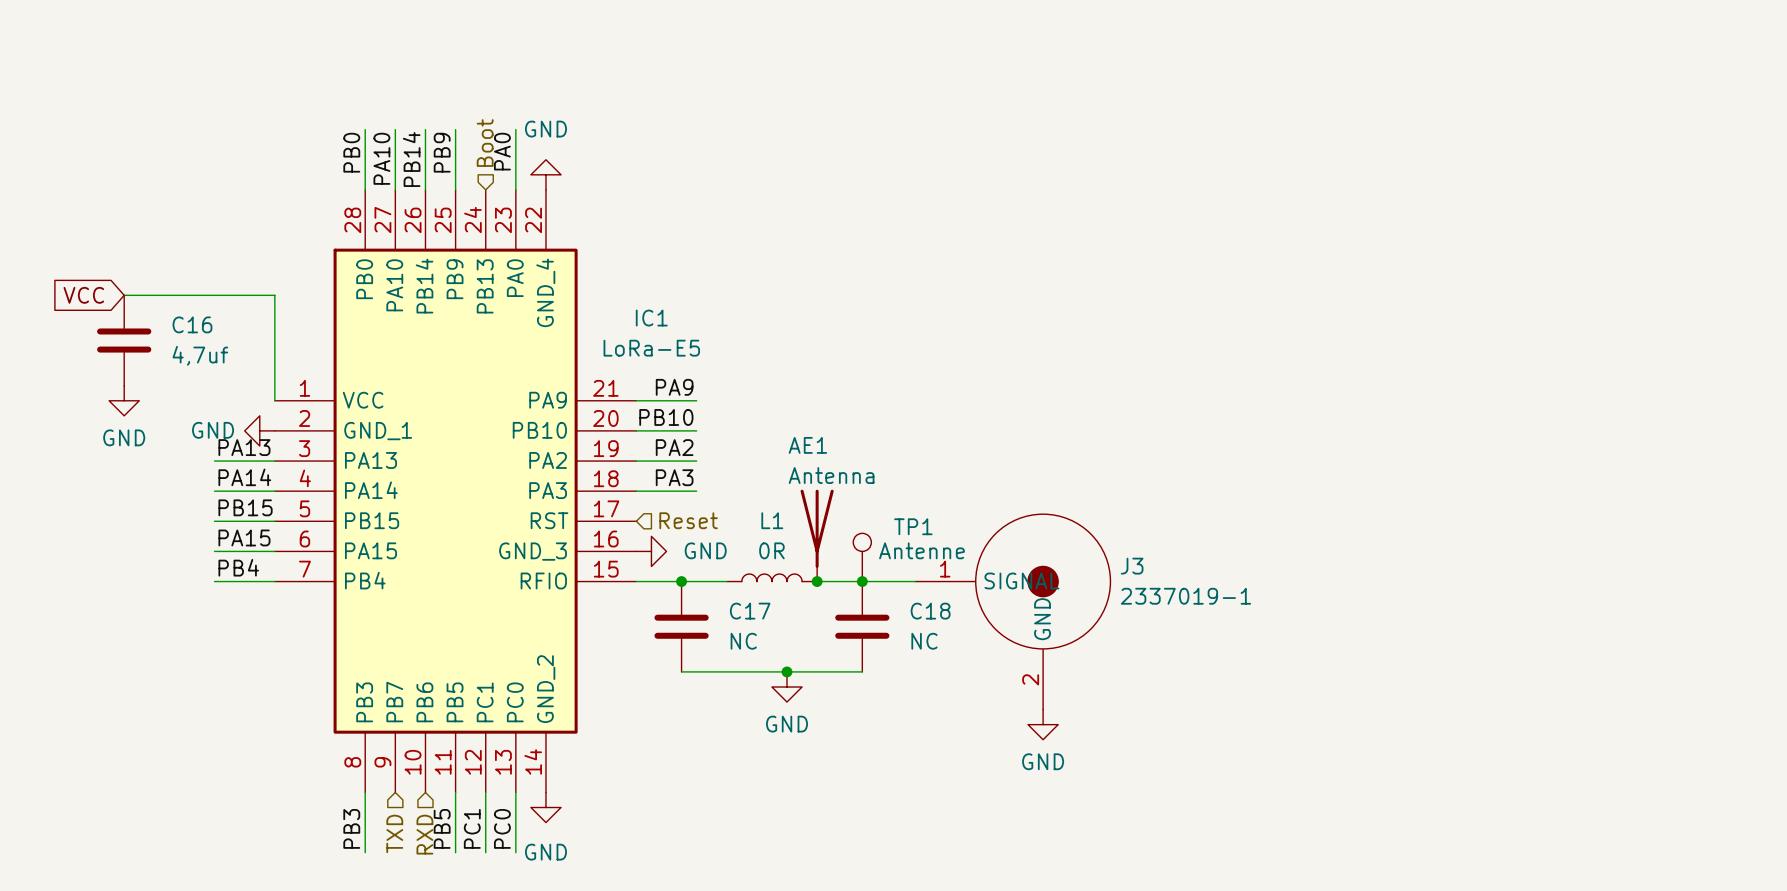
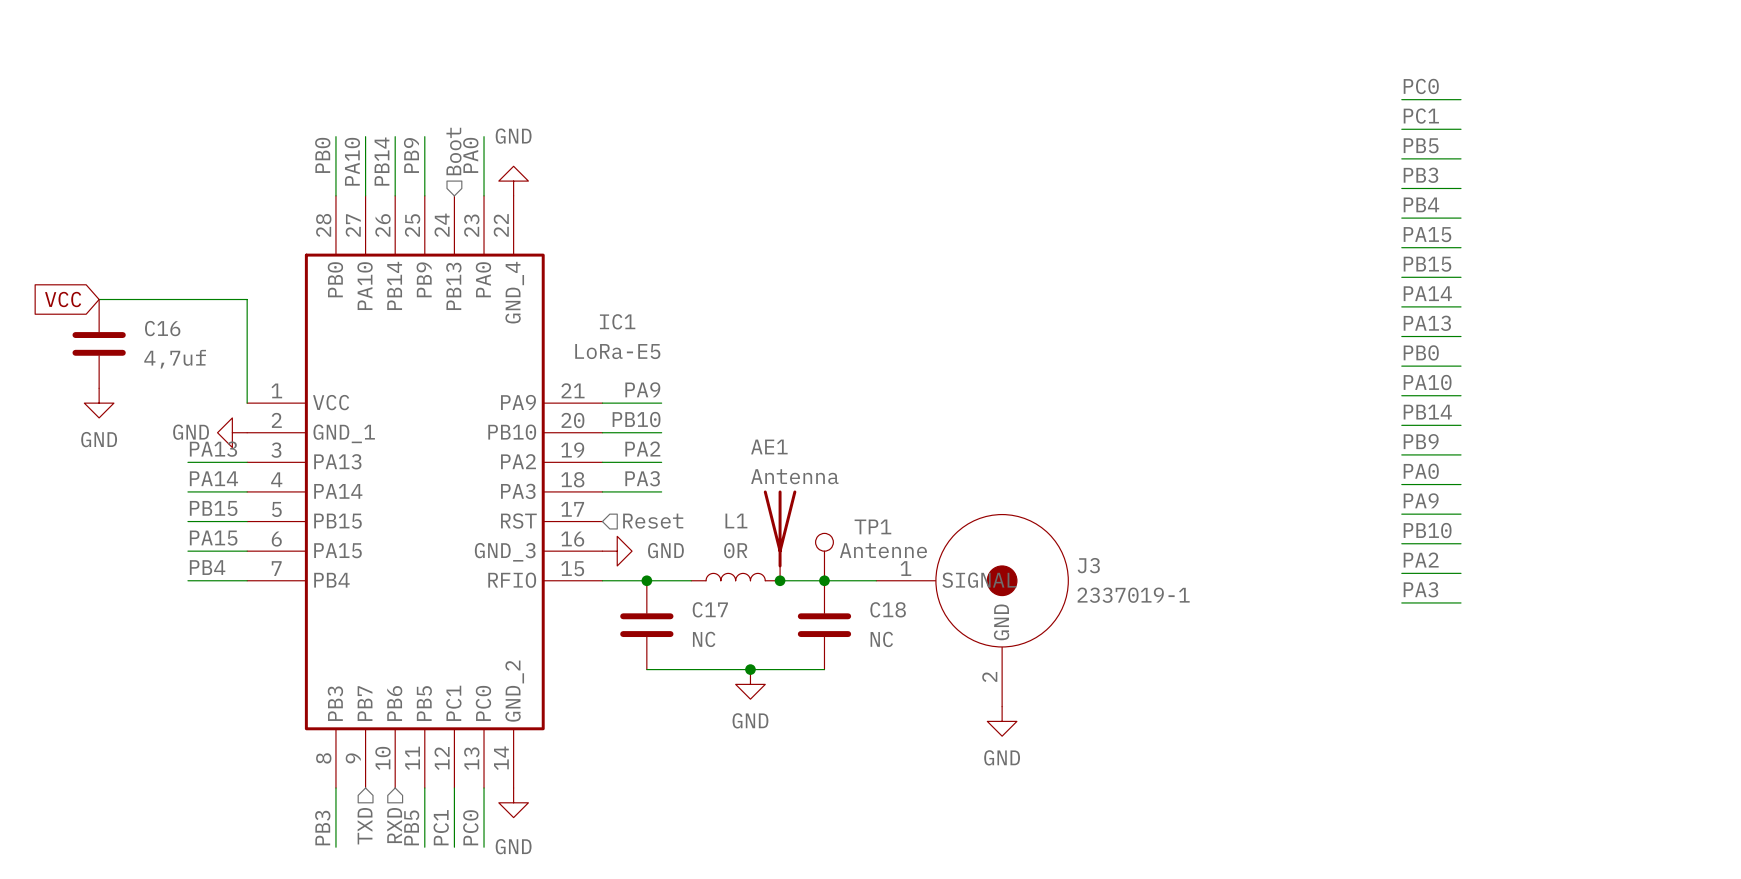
label: none -> PC0 (1421, 86)
wire: none -> (1401, 99) (1461, 99)
label: none -> PC1 (1421, 116)
wire: none -> (1401, 129) (1461, 129)
label: none -> PB5 (1421, 145)
wire: none -> (1401, 158) (1461, 158)
label: none -> PB3 (1420, 175)
wire: none -> (1401, 188) (1461, 188)
label: none -> PB4 (1421, 204)
wire: none -> (1401, 218) (1461, 218)
label: none -> PA15 (1427, 234)
wire: none -> (1401, 247) (1461, 247)
label: none -> PB15 (1427, 264)
wire: none -> (1401, 277) (1461, 277)
label: none -> PA14 (1427, 293)
wire: none -> (1401, 306) (1461, 306)
label: none -> PA13 (1427, 323)
wire: none -> (1401, 336) (1461, 336)
label: none -> PB0 (1421, 352)
wire: none -> (1401, 366) (1461, 366)
label: none -> PA10 (1427, 382)
wire: none -> (1401, 395) (1461, 395)
label: none -> PB14 (1427, 412)
wire: none -> (1401, 425) (1461, 425)
label: none -> PB9 (1421, 441)
wire: none -> (1401, 454) (1461, 454)
label: none -> PA0 (1421, 471)
wire: none -> (1401, 484) (1461, 484)
label: none -> PA9 (1421, 500)
wire: none -> (1401, 514) (1461, 514)
label: none -> PB10 (1427, 530)
wire: none -> (1401, 543) (1461, 543)
label: none -> PA2 (1421, 560)
wire: none -> (1401, 573) (1461, 573)
label: none -> PA3 (1420, 589)
wire: none -> (1401, 602) (1461, 602)

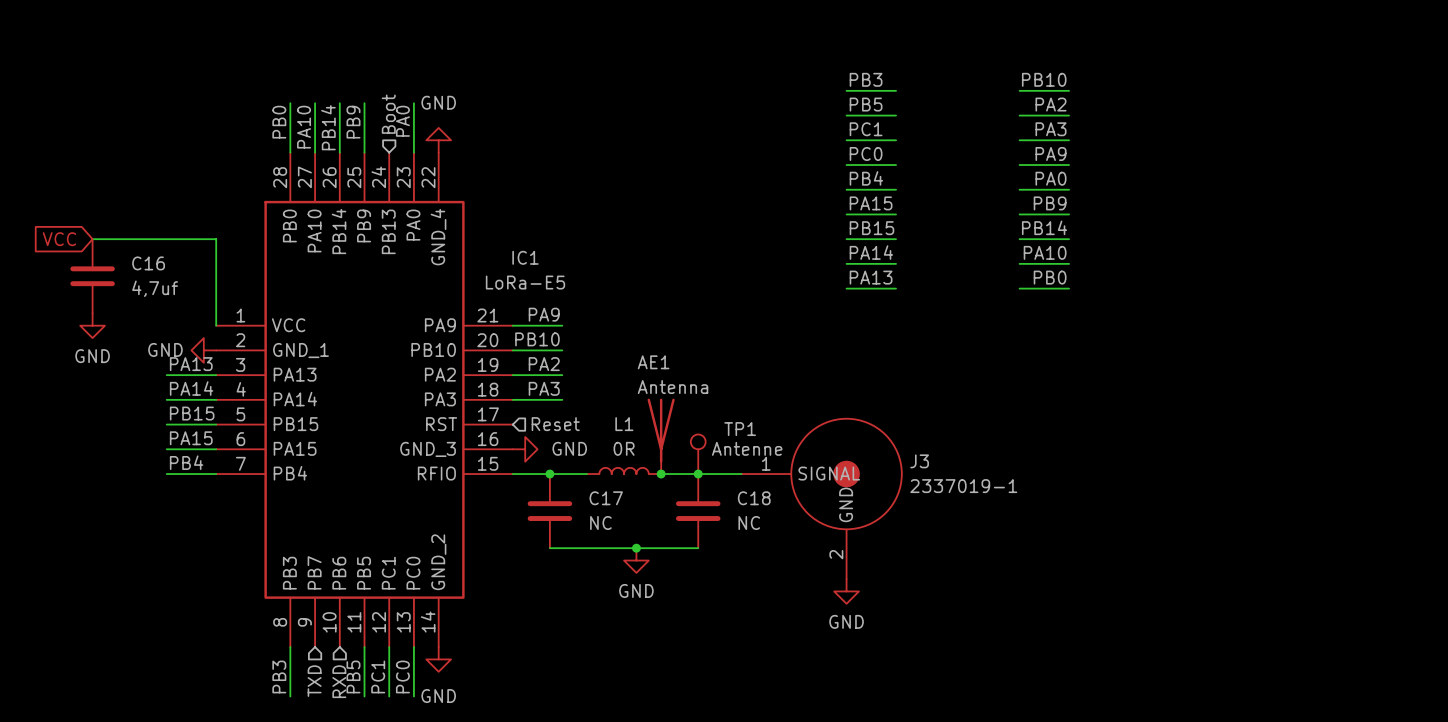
label: PC0 (1421, 86) -> none
wire: (1401, 99) (1461, 99) -> none
label: none -> PB3 (866, 79)
label: none -> PB10 (1044, 79)
label: PC1 (1421, 116) -> none
wire: none -> (846, 90) (896, 90)
wire: (1401, 129) (1461, 129) -> (1019, 90) (1069, 90)
label: none -> PB5 (866, 104)
label: none -> PA2 (1050, 104)
label: PB5 (1421, 145) -> none
wire: none -> (846, 115) (896, 115)
wire: (1401, 158) (1461, 158) -> (1019, 115) (1069, 115)
label: none -> PC1 (866, 129)
label: none -> PA3 (1050, 129)
label: PB3 (1420, 175) -> none
wire: none -> (846, 140) (896, 140)
wire: (1401, 188) (1461, 188) -> (1019, 140) (1069, 140)
label: none -> PC0 (866, 153)
label: none -> PA9 (1050, 153)
label: PB4 (1421, 204) -> none
wire: none -> (846, 165) (896, 165)
wire: (1401, 218) (1461, 218) -> (1019, 165) (1069, 165)
label: none -> PB4 (866, 178)
label: PA15 (1427, 234) -> none
wire: none -> (846, 189) (896, 189)
wire: (1401, 247) (1461, 247) -> (1019, 189) (1069, 189)
label: none -> PA15 (871, 203)
label: PB15 (1427, 264) -> none
wire: none -> (846, 214) (896, 214)
wire: (1401, 277) (1461, 277) -> (1019, 214) (1069, 214)
label: none -> PB15 (871, 228)
label: PA14 (1427, 293) -> none
wire: none -> (846, 239) (896, 239)
wire: (1401, 306) (1461, 306) -> (1019, 239) (1069, 239)
label: none -> PA14 (871, 252)
label: PA13 (1427, 323) -> none
wire: none -> (846, 263) (896, 263)
wire: (1401, 336) (1461, 336) -> (1019, 263) (1069, 263)
label: none -> PA13 (871, 277)
label position: PB0 (1421, 352) -> PB0 (1050, 277)
wire: none -> (846, 288) (896, 288)
wire: (1401, 366) (1461, 366) -> (1019, 288) (1069, 288)
label position: PA10 (1427, 382) -> PA10 (1045, 252)
wire: (1401, 395) (1461, 395) -> none
label position: PB14 (1427, 412) -> PB14 (1044, 227)
wire: (1401, 425) (1461, 425) -> none
label position: PB9 (1421, 441) -> PB9 (1050, 203)
wire: (1401, 454) (1461, 454) -> none
label position: PA0 (1421, 471) -> PA0 (1050, 178)
wire: (1401, 484) (1461, 484) -> none
label: PA9 (1421, 500) -> none
wire: (1401, 514) (1461, 514) -> none
label: PB10 (1427, 530) -> none
wire: (1401, 543) (1461, 543) -> none
label: PA2 (1421, 560) -> none
wire: (1401, 573) (1461, 573) -> none
label: PA3 (1420, 589) -> none
wire: (1401, 602) (1461, 602) -> none

